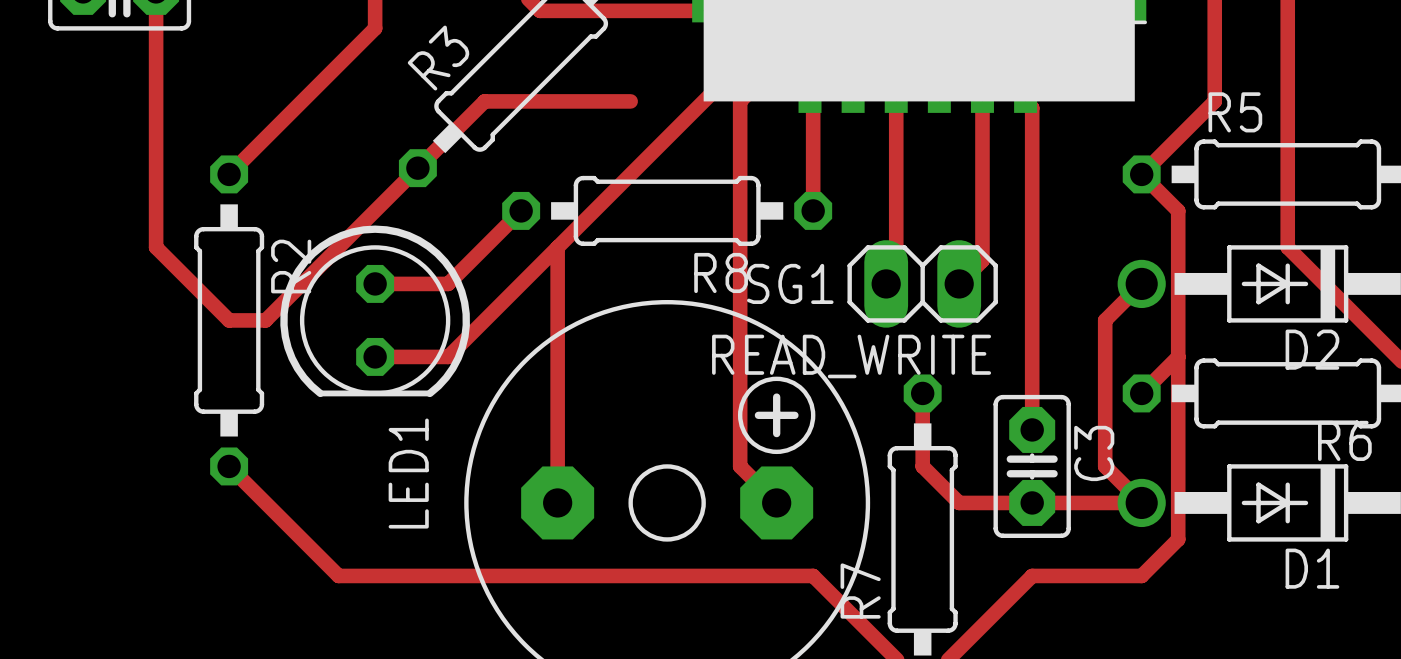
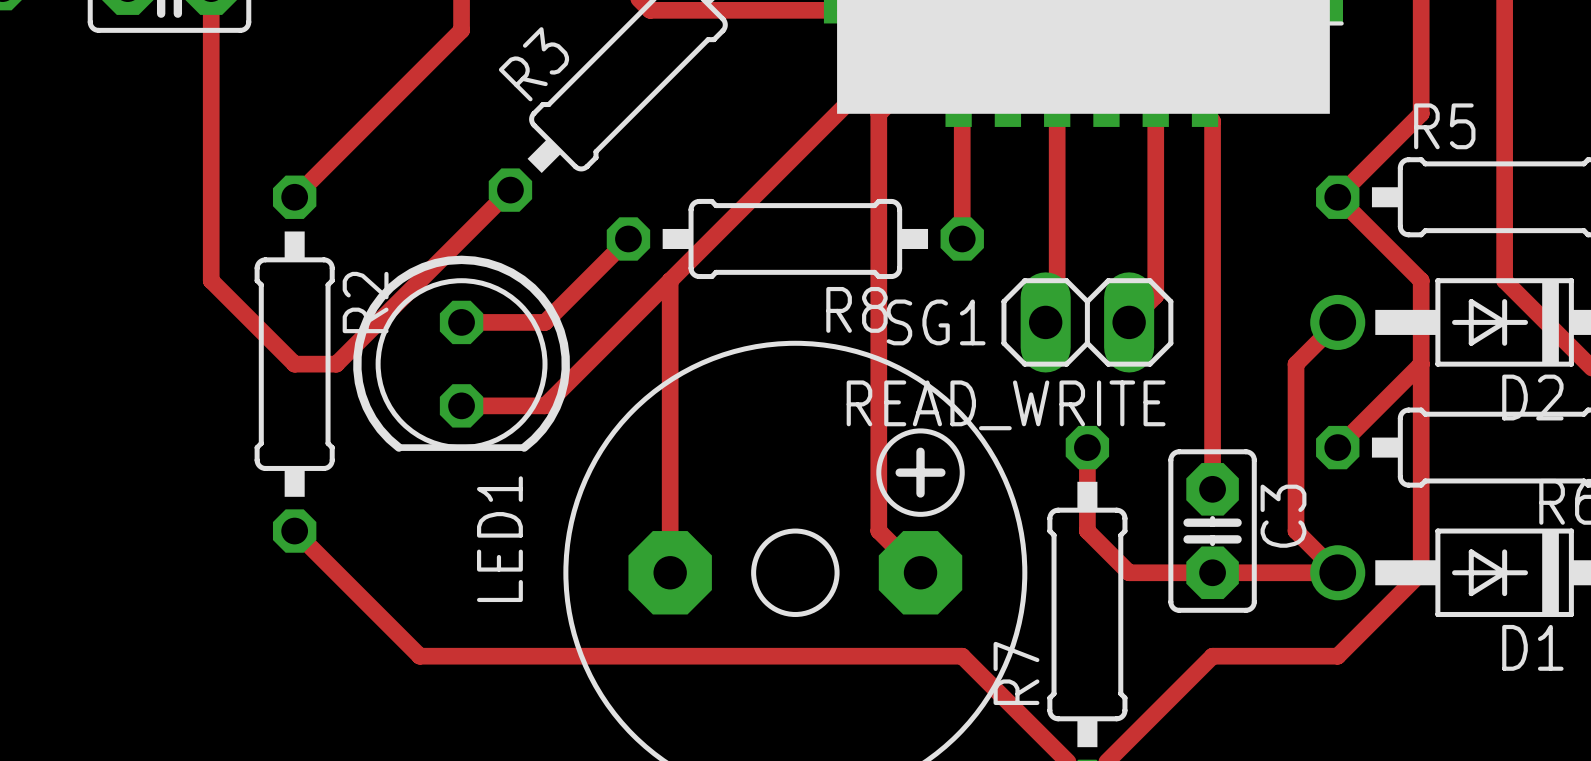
track: (630, 101) (484, 101) (417, 168) -> none
track: (1178, 210) (1178, 539) -> (1379, 238) (1421, 280) (1421, 572) (1379, 614)
track: none -> (1421, 364) (1379, 405)

